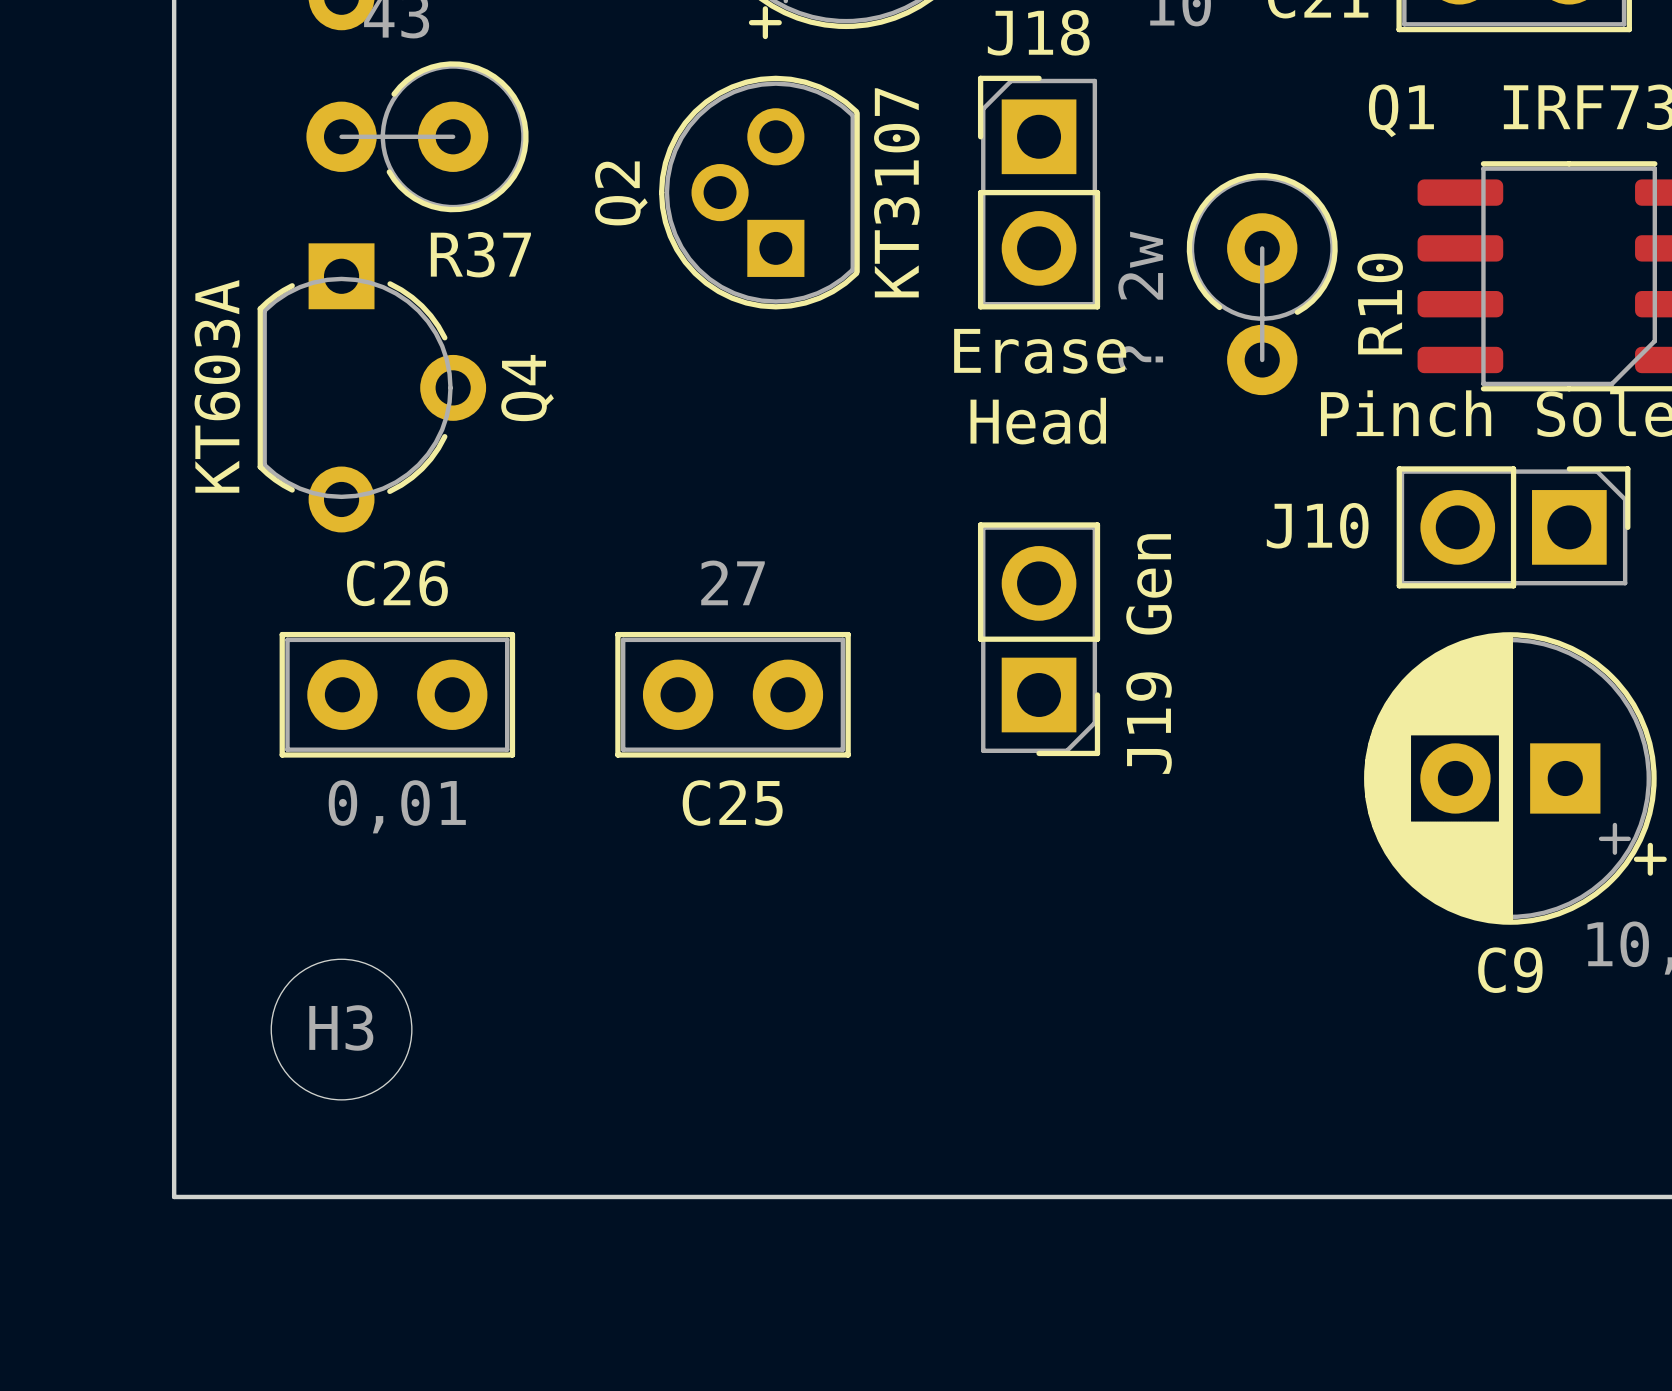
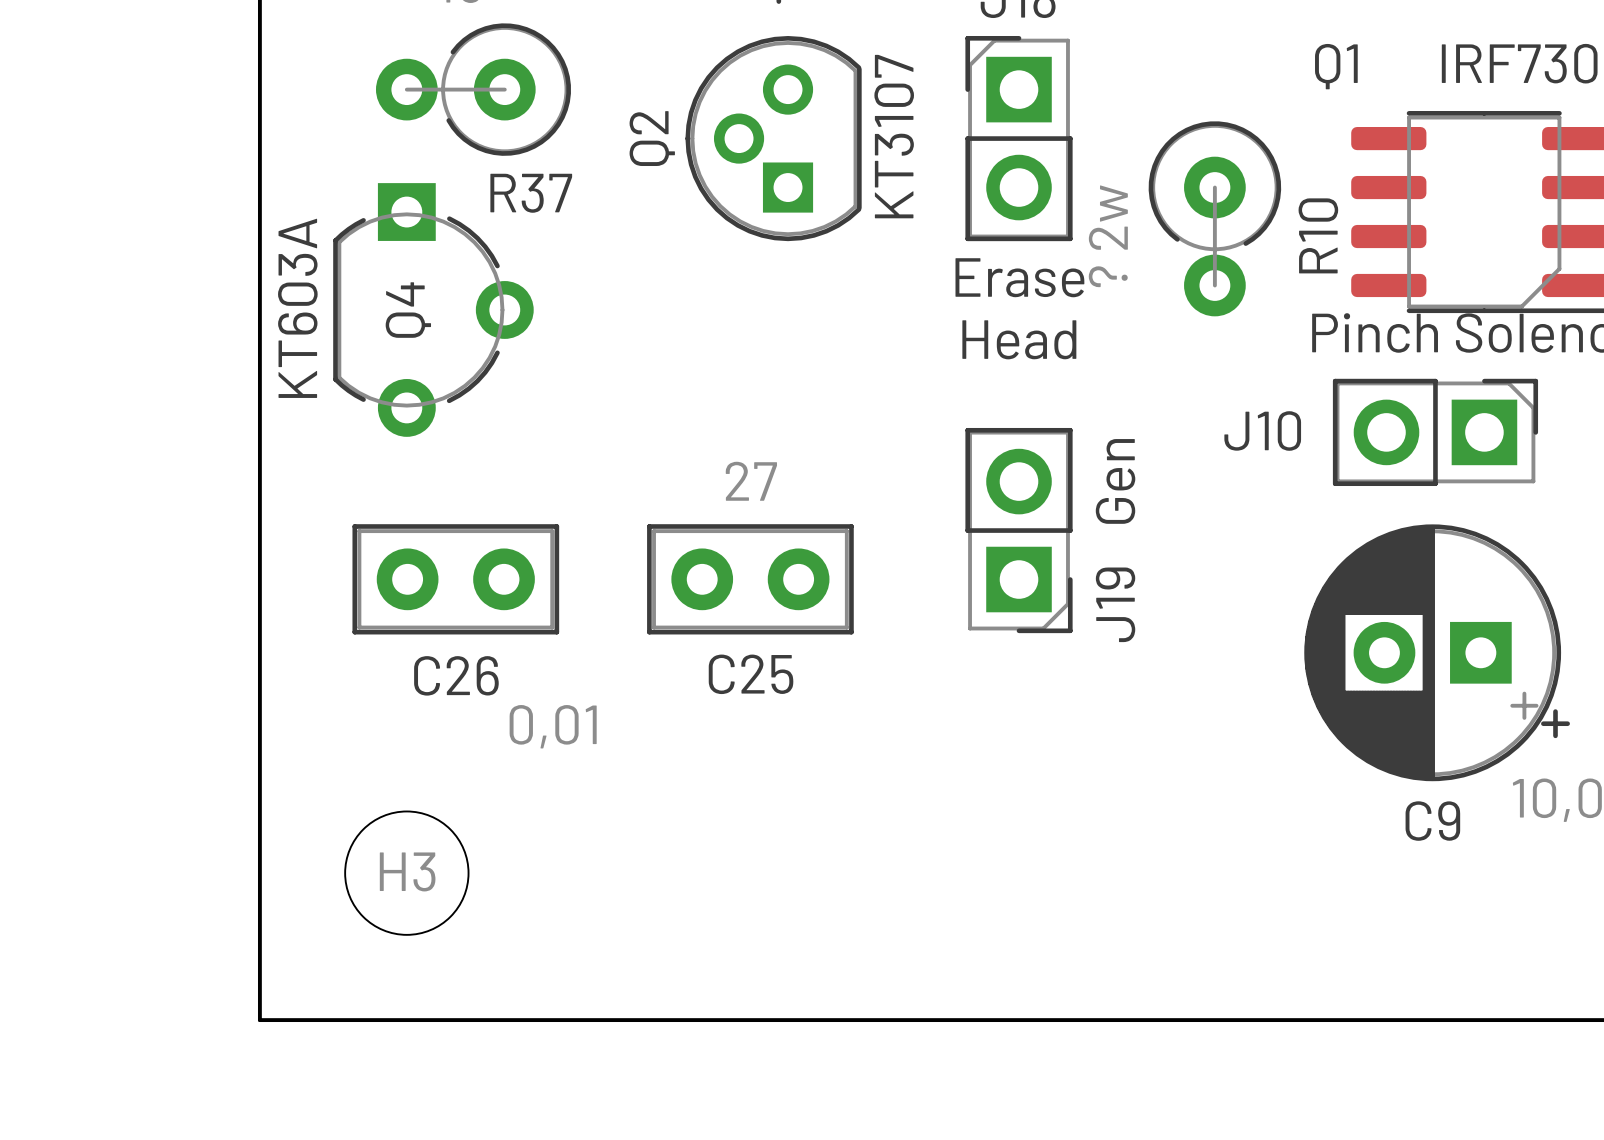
Q4 name position: Q4 (527, 388) -> Q4 (408, 310)
C26 name position: C26 (397, 583) -> C26 (456, 675)
C26 value position: 0,01 (397, 806) -> 0,01 (553, 726)

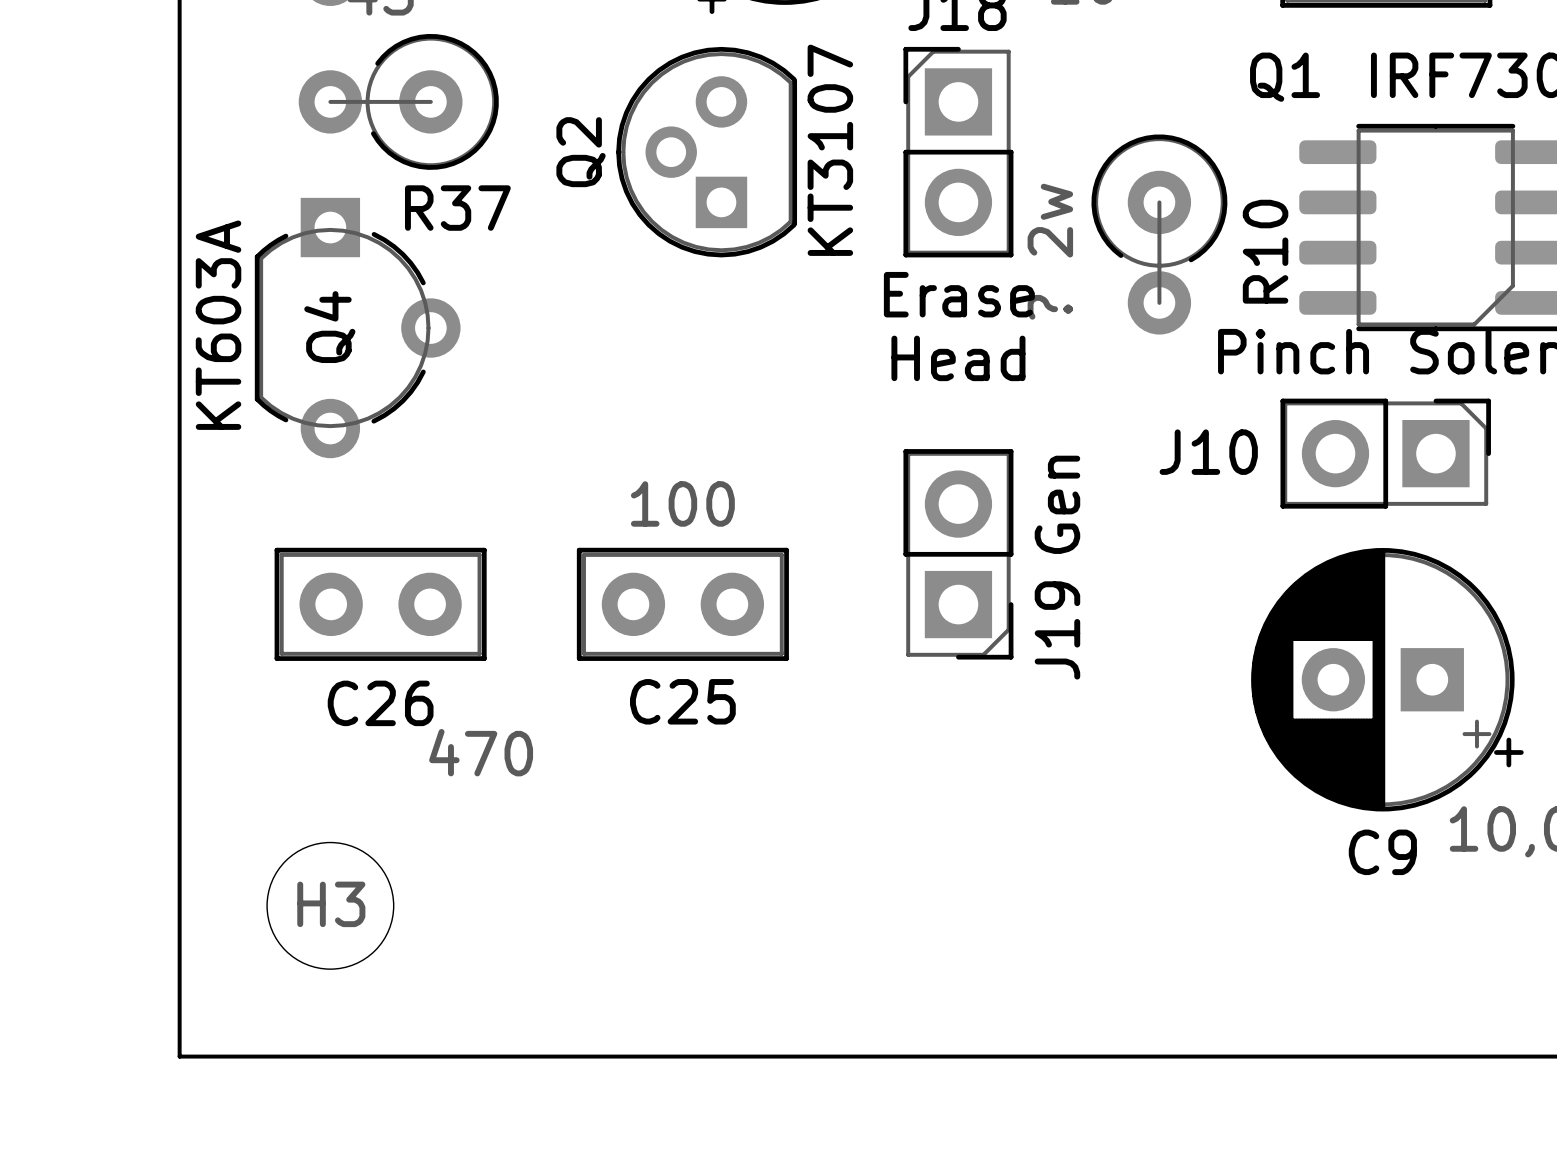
C25 value: 27 (751, 481) -> 100 (682, 503)
C26 value: 0,01 (553, 726) -> 470 (481, 752)

